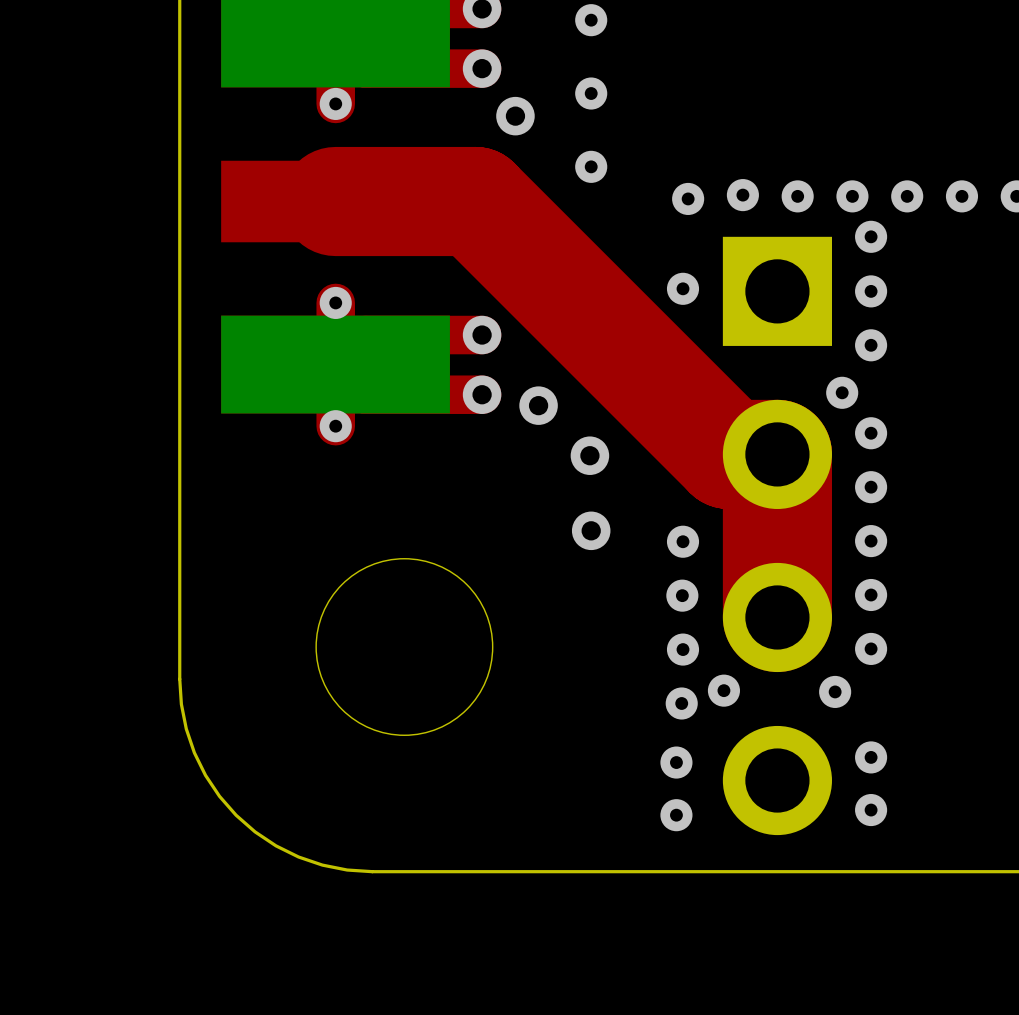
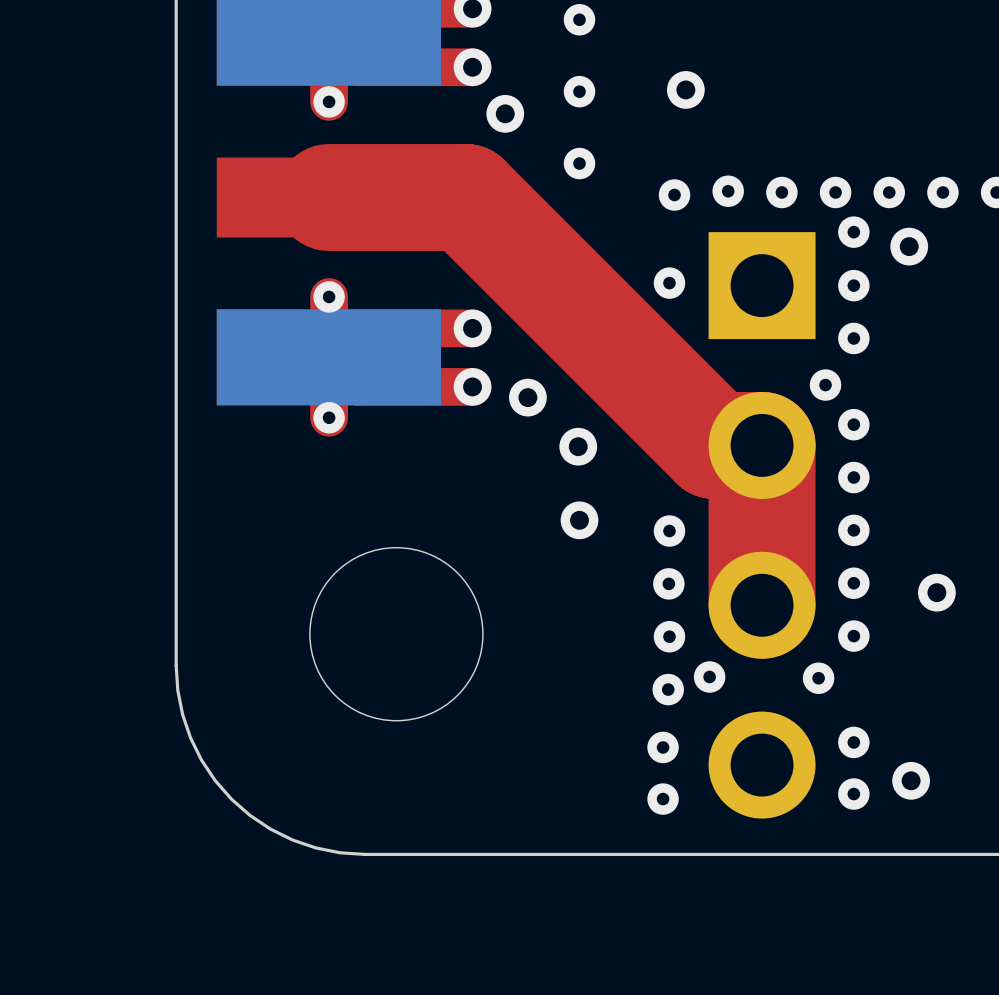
via: none -> (685, 89)
via: none -> (909, 246)
via: none -> (936, 592)
via: none -> (911, 780)

